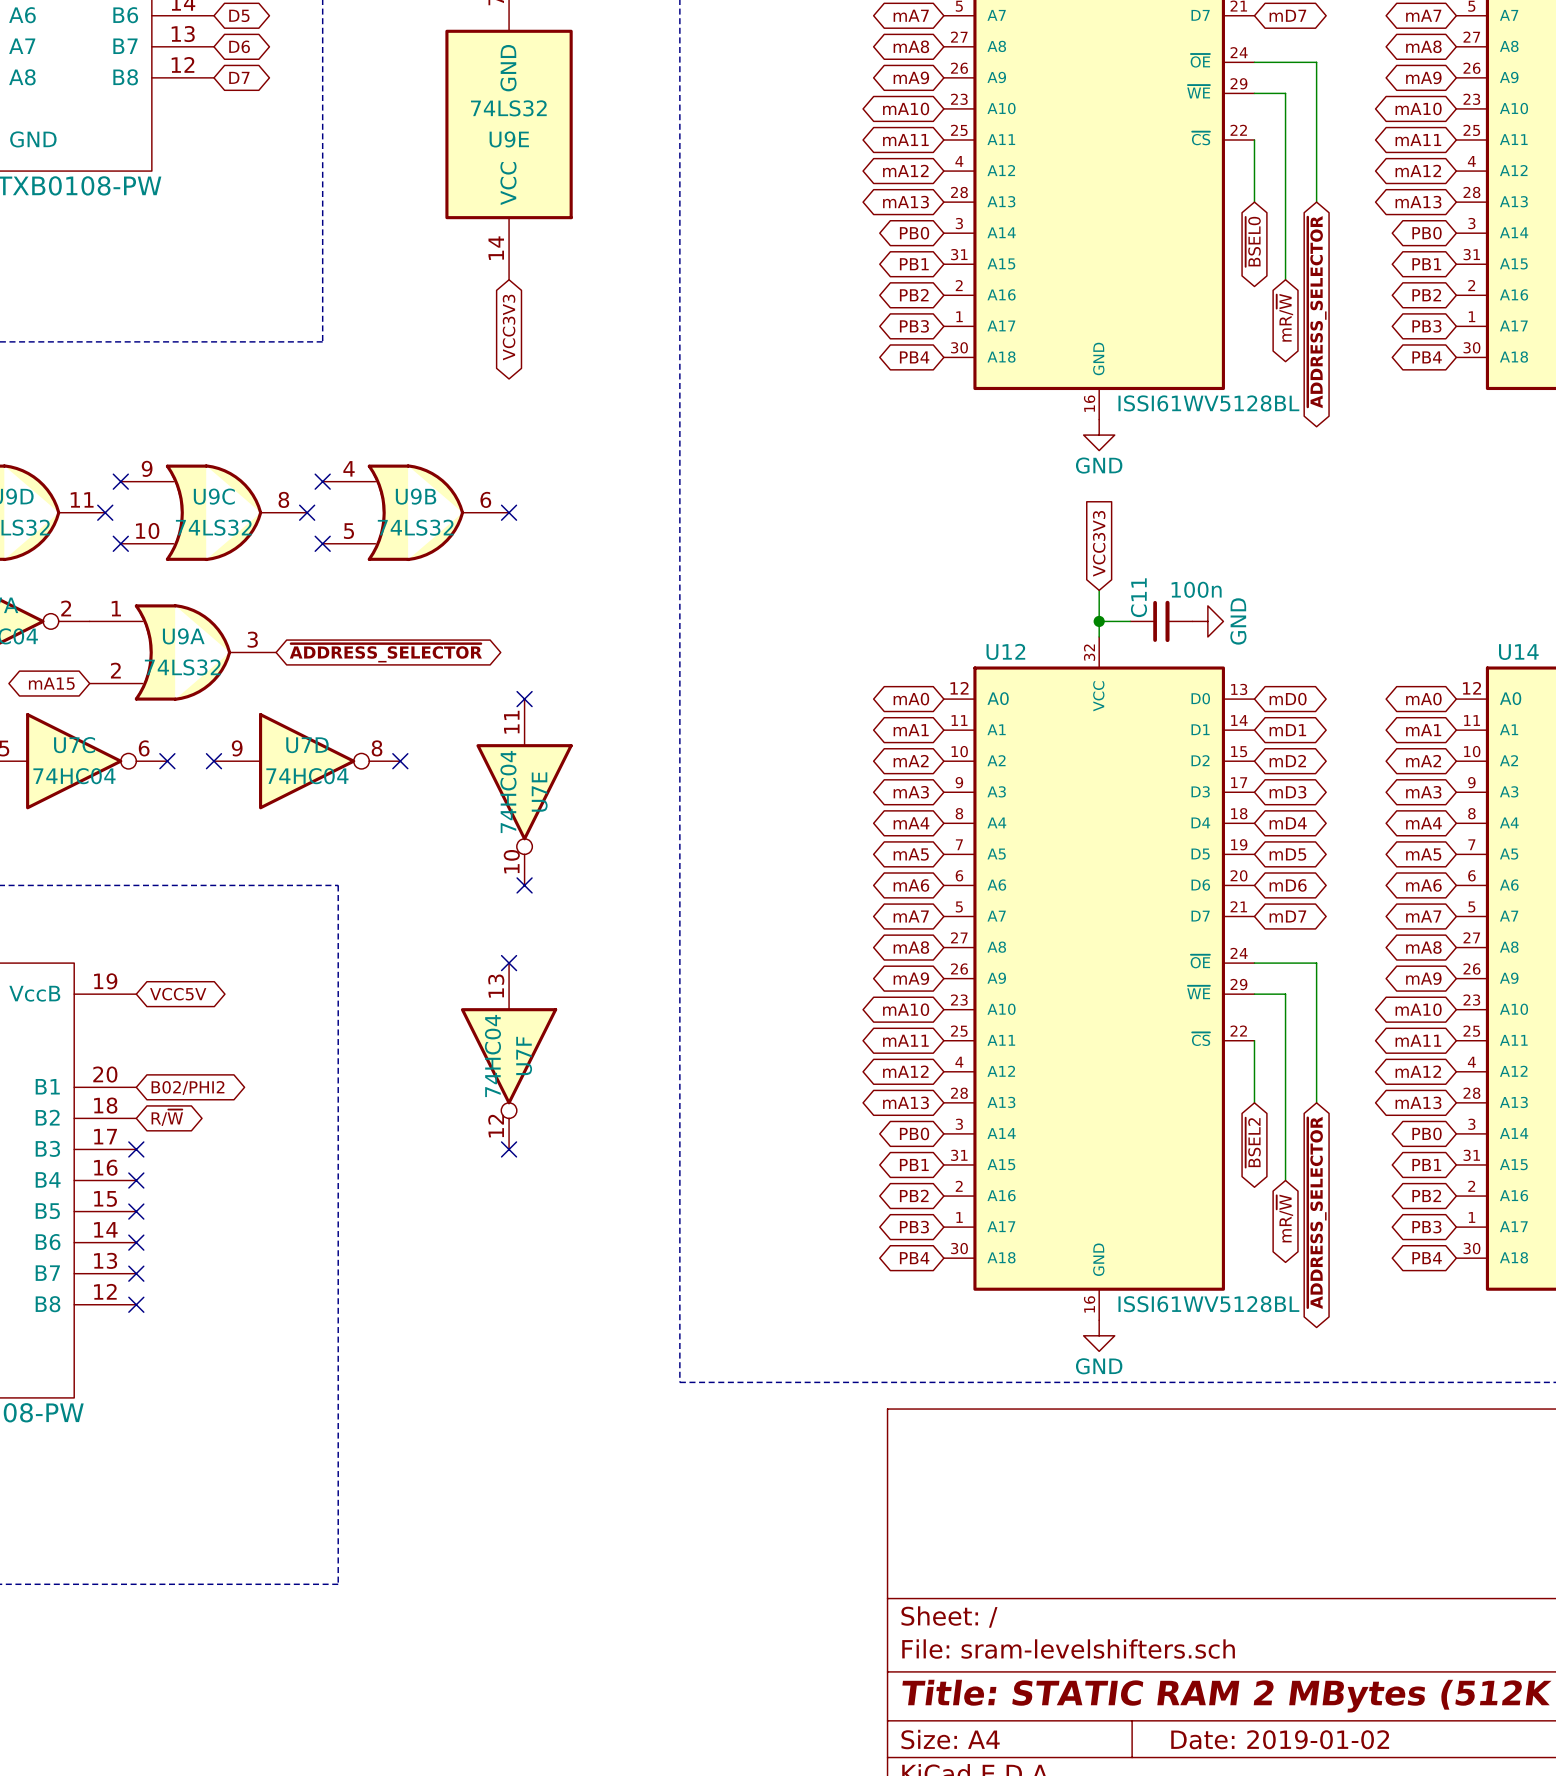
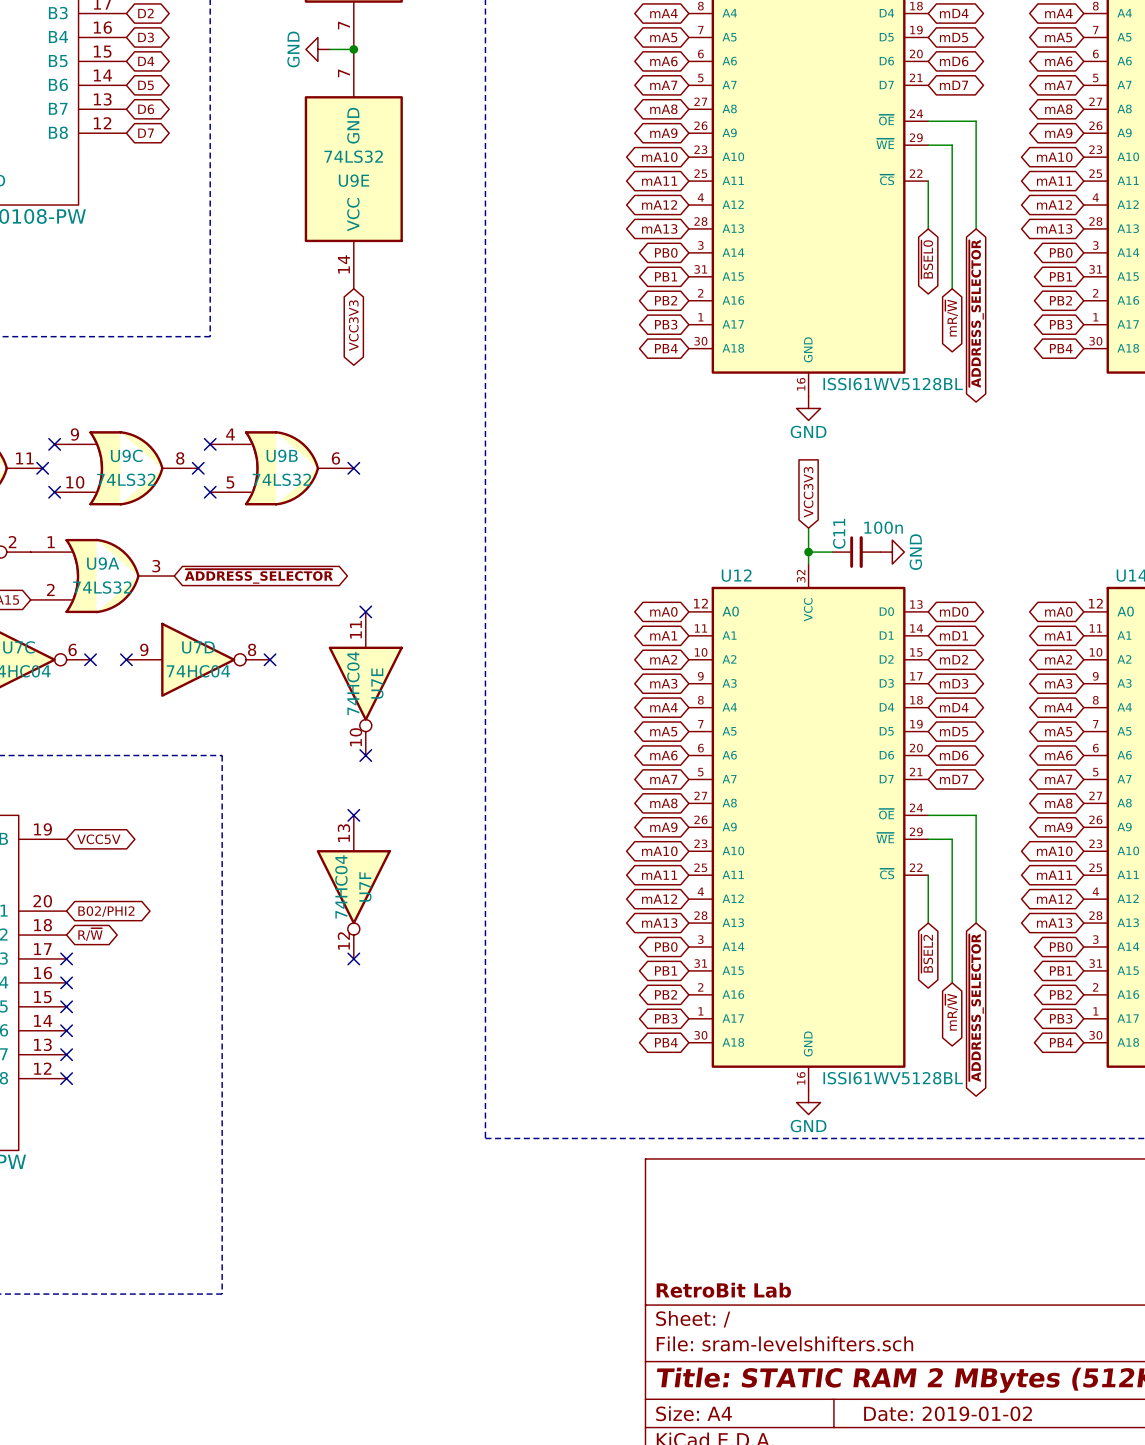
title block: none -> RetroBit Lab (723, 1290)

